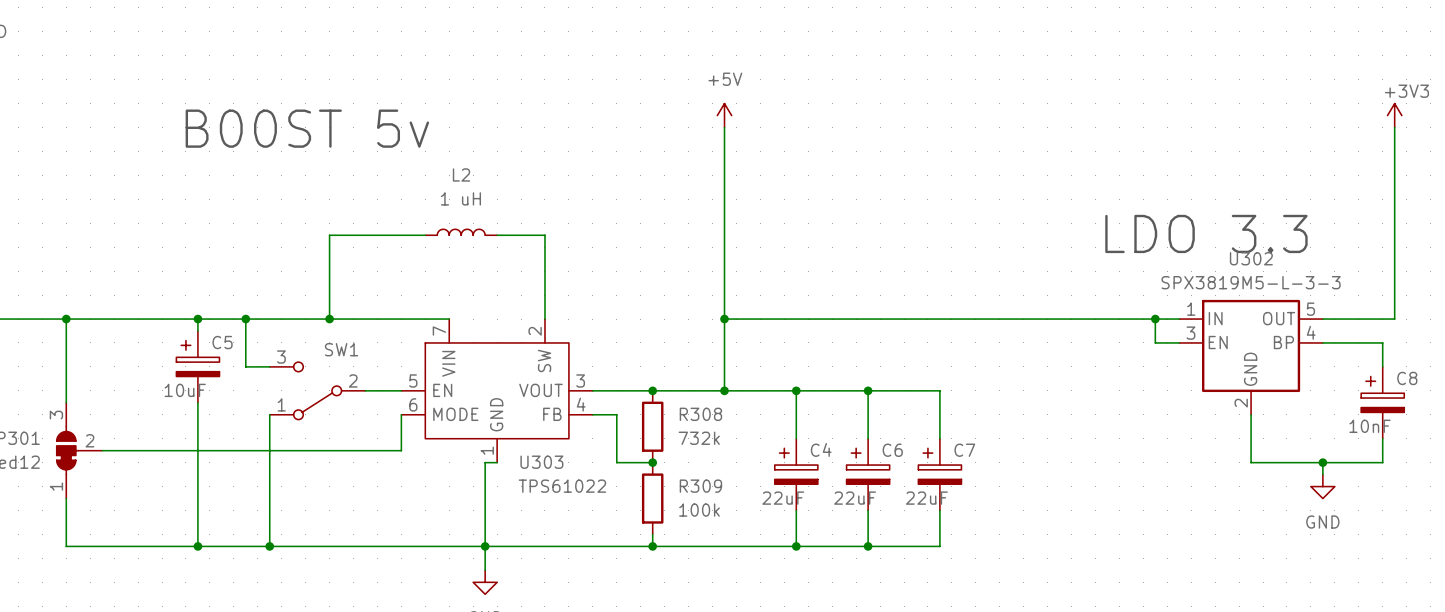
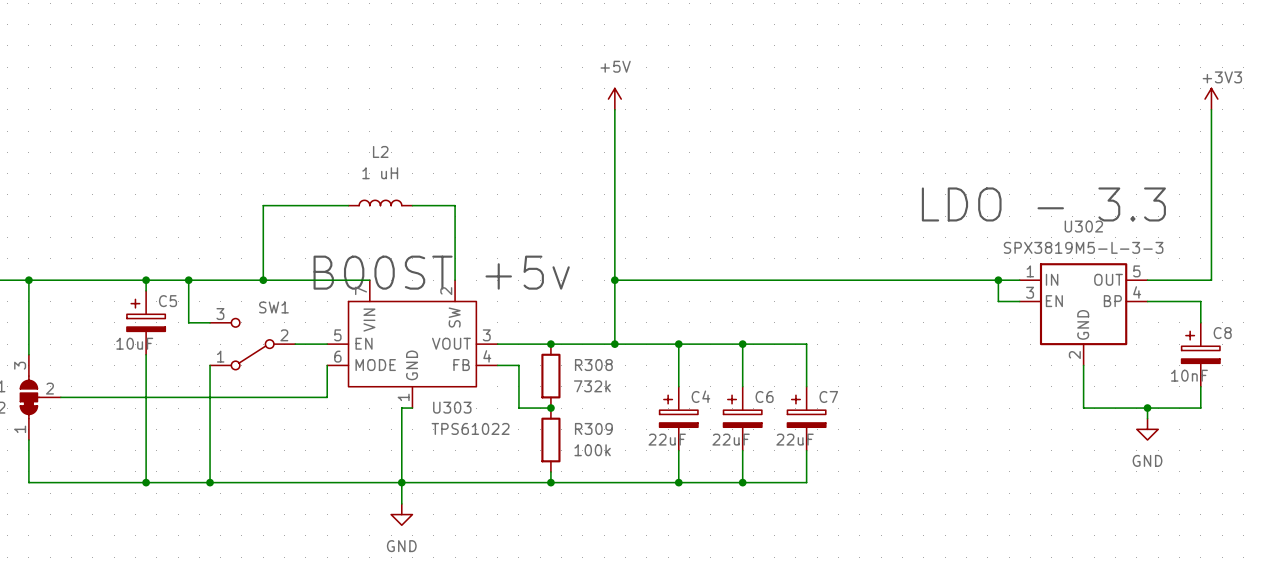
text: B00ST 5v (307, 128) -> none
text: LDO 3.3 (1206, 233) -> LDO - 3.3 (1043, 204)
text: none -> B00ST +5v (441, 272)

